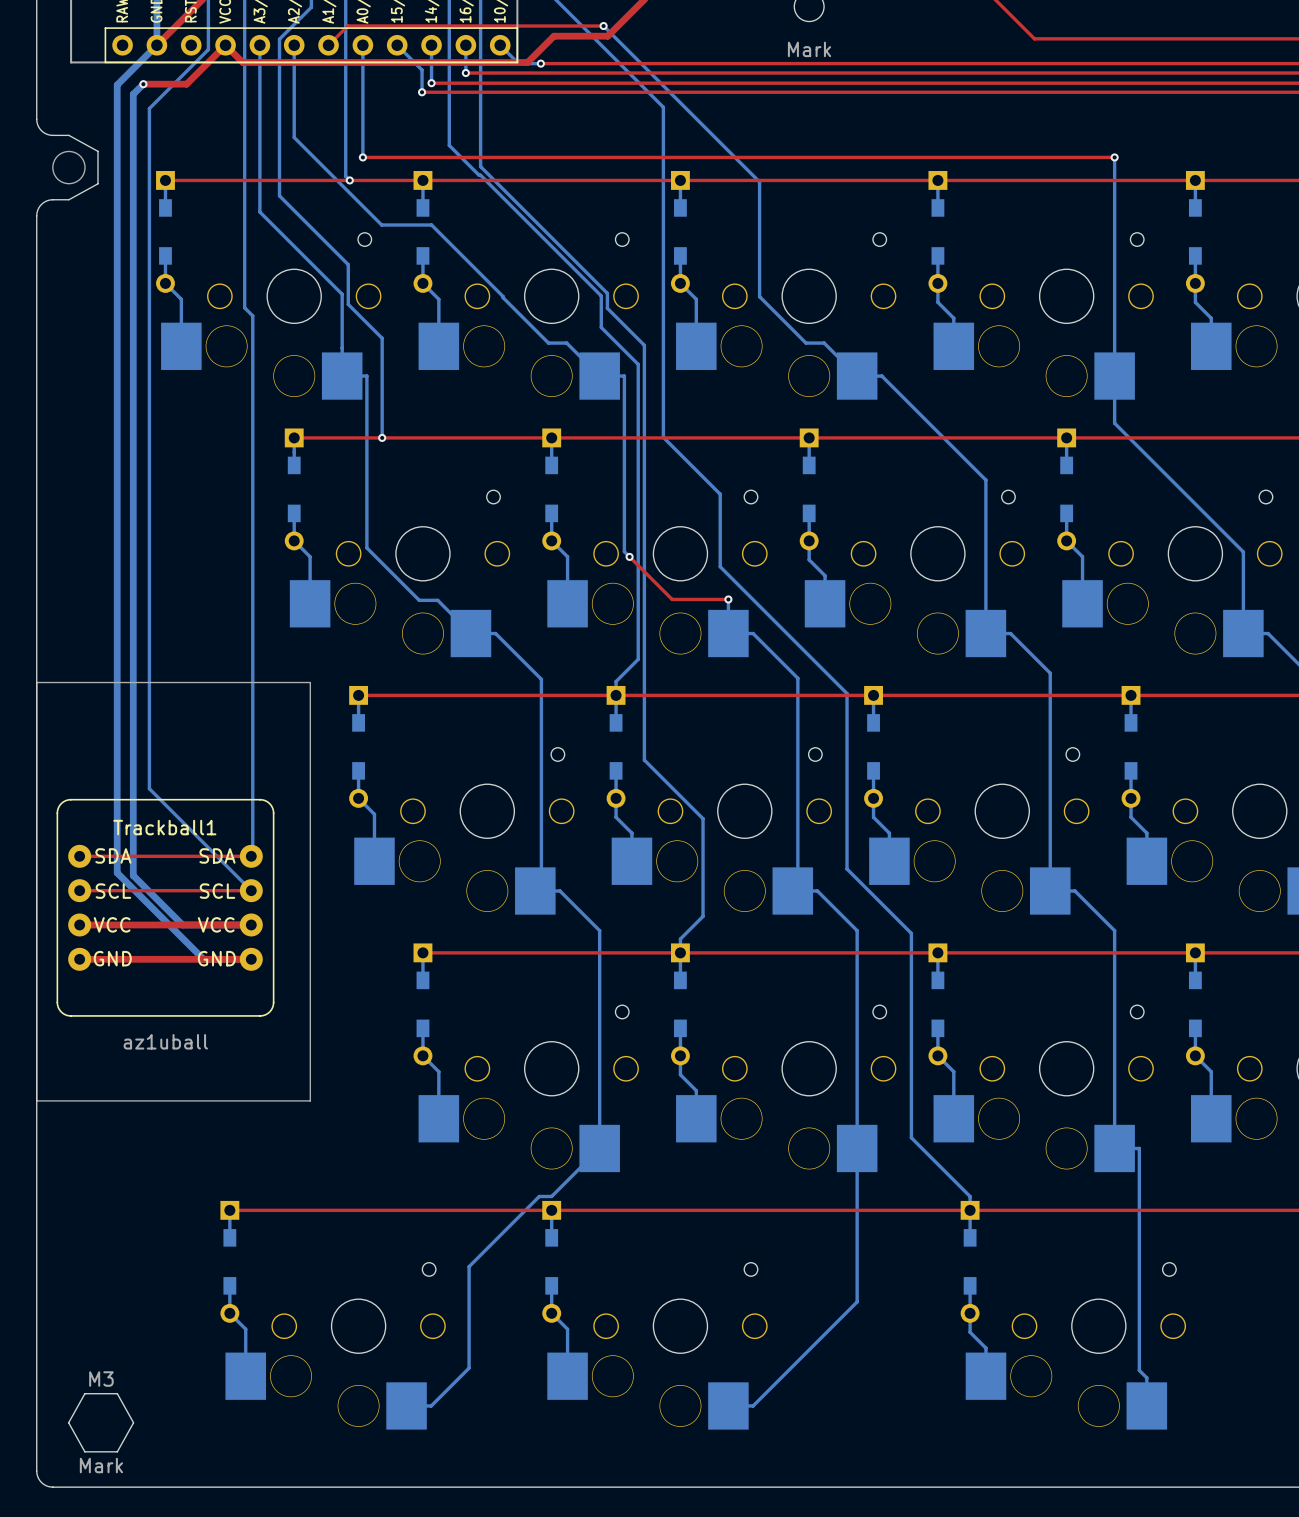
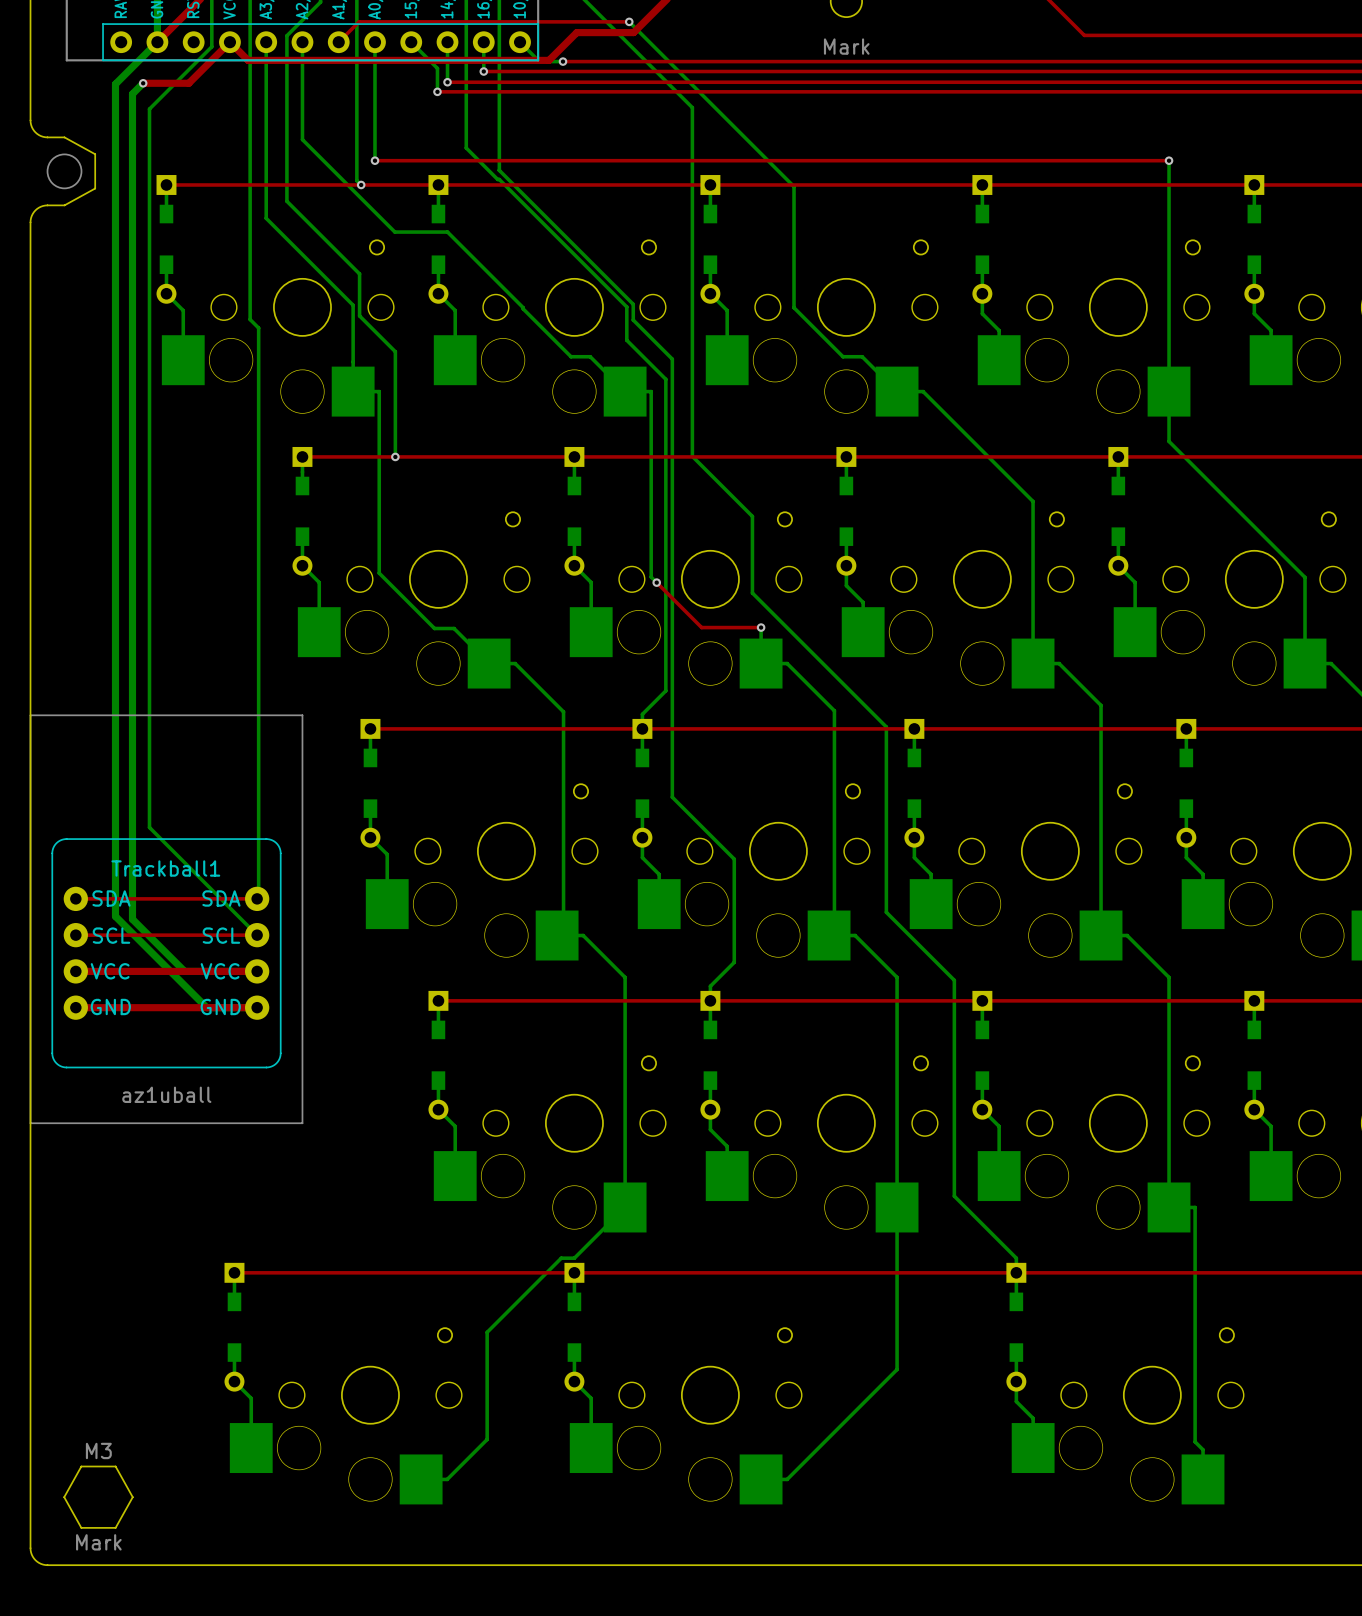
line: (294, 682) (310, 682) (310, 1100) (36, 1100) (36, 1068) -> (302, 715) (302, 1123) (30, 1123)

